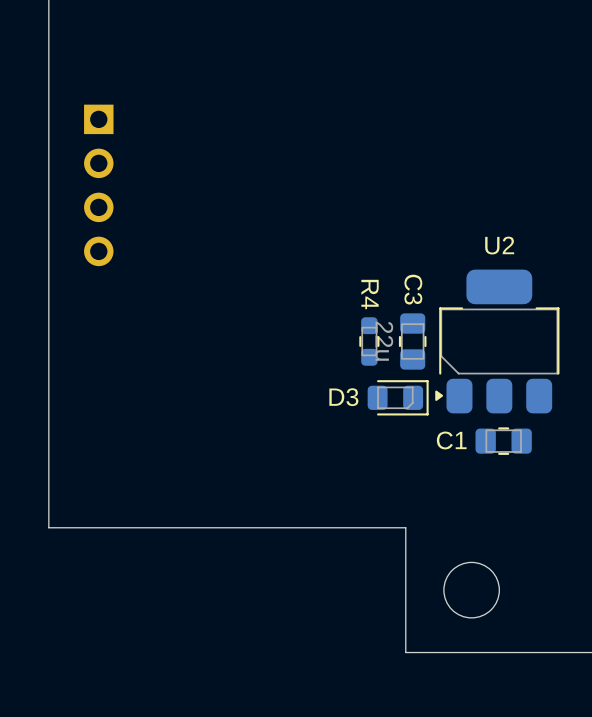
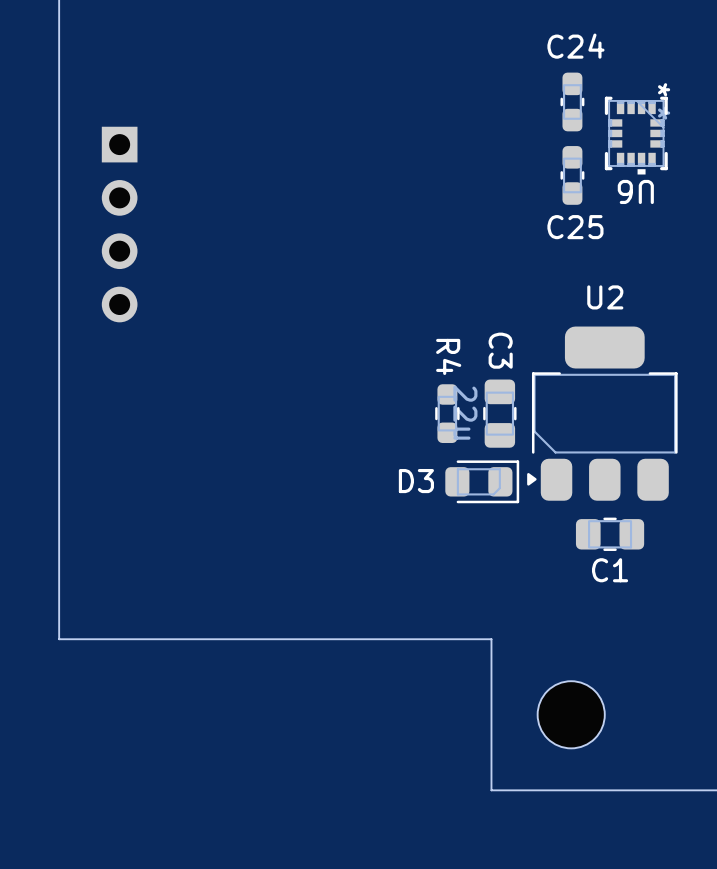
C24: none -> (572, 101)
U6: none -> (636, 135)
C25: none -> (572, 175)
C1 name position: C1 (451, 440) -> C1 (610, 570)

